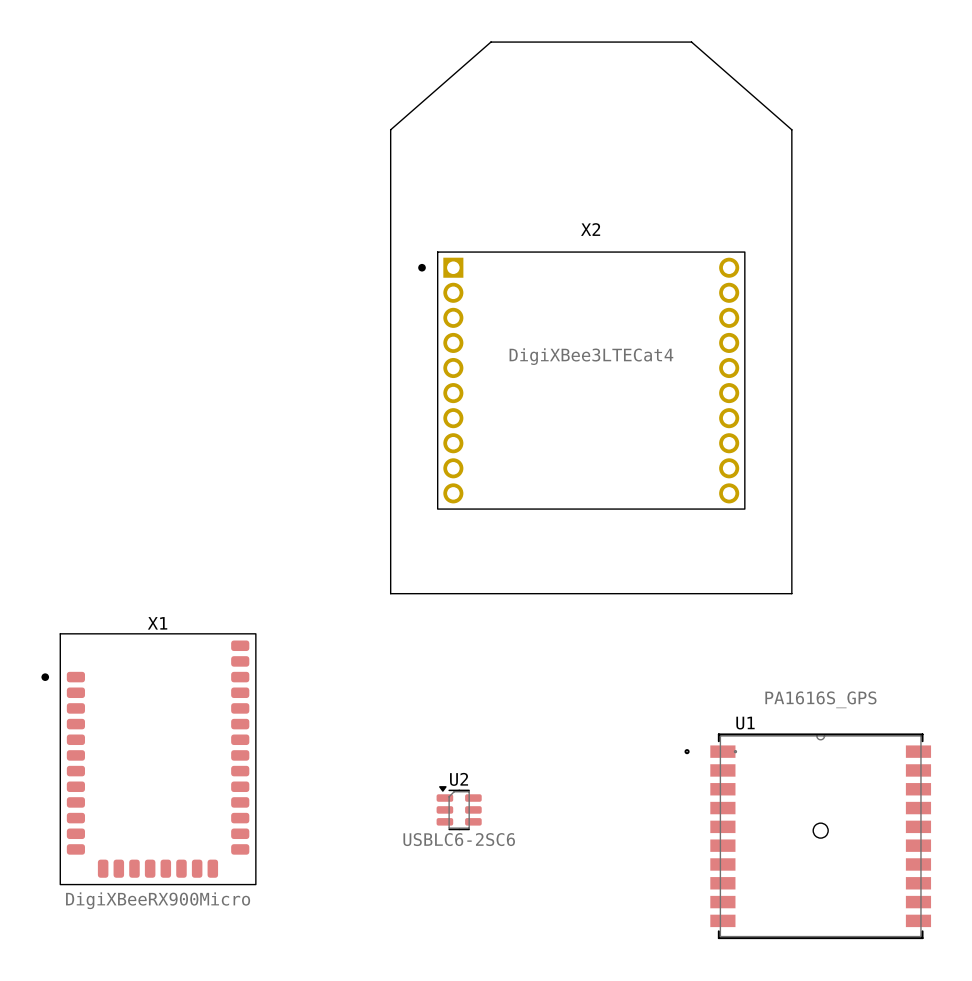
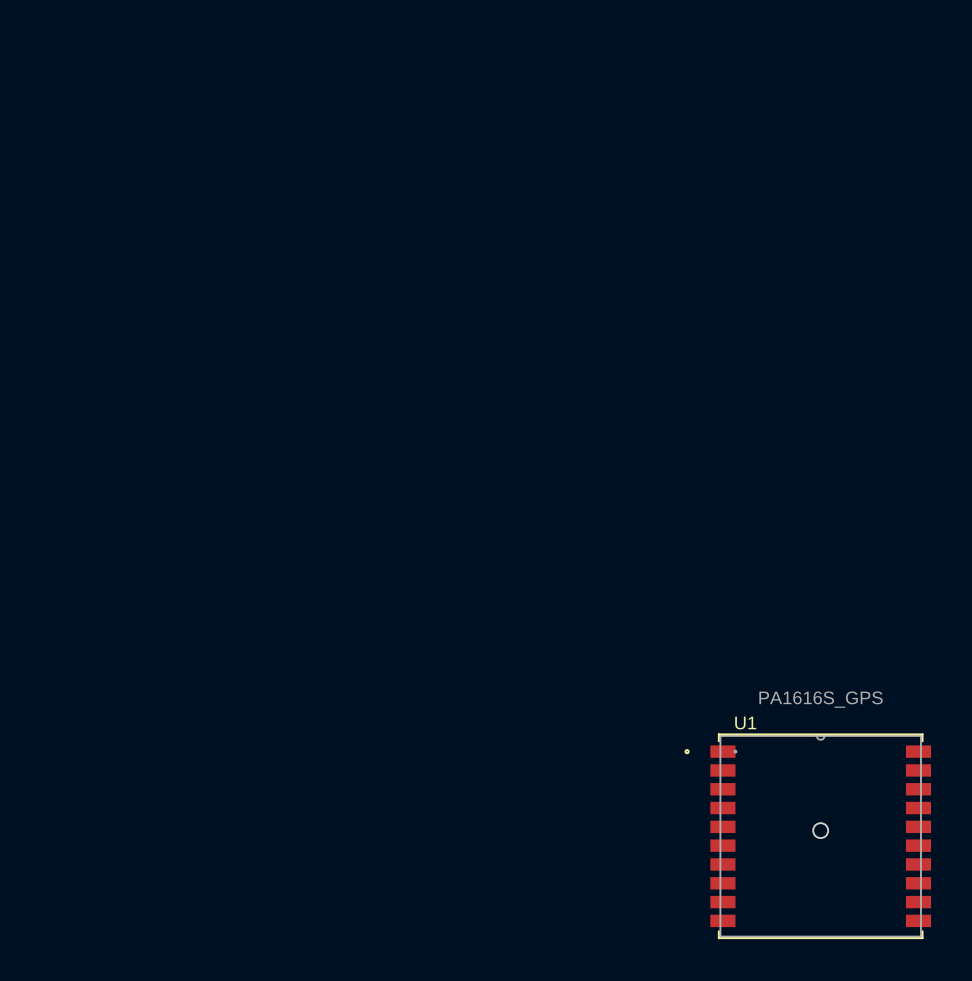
X2: DigiXBee3LTECat4 (591, 317) -> none
X1: DigiXBeeRX900Micro (148, 759) -> none
U2: USBLC6-2SC6 (459, 808) -> none

